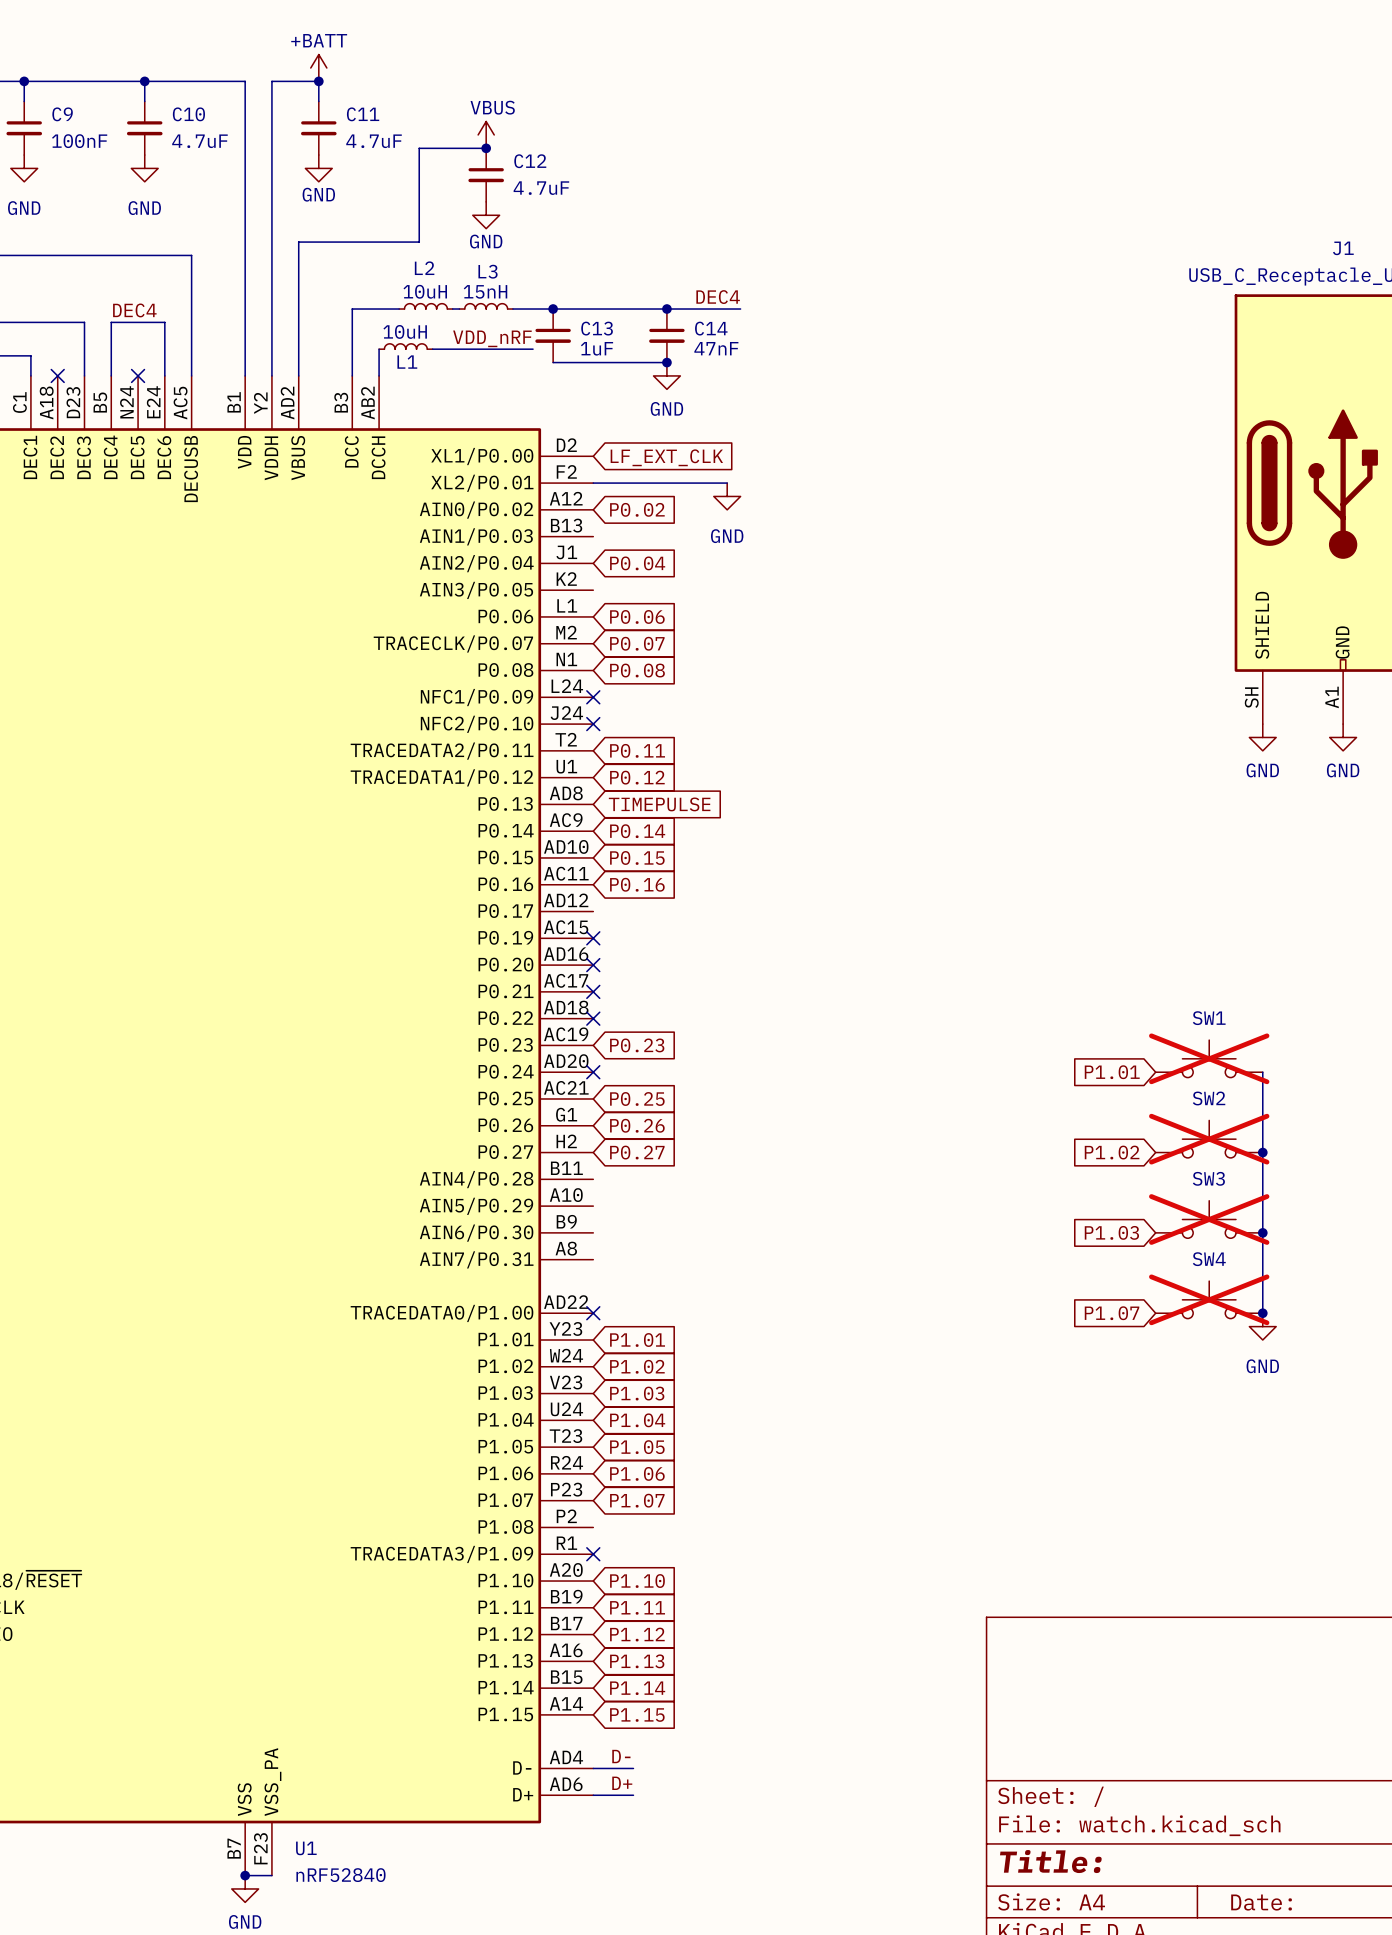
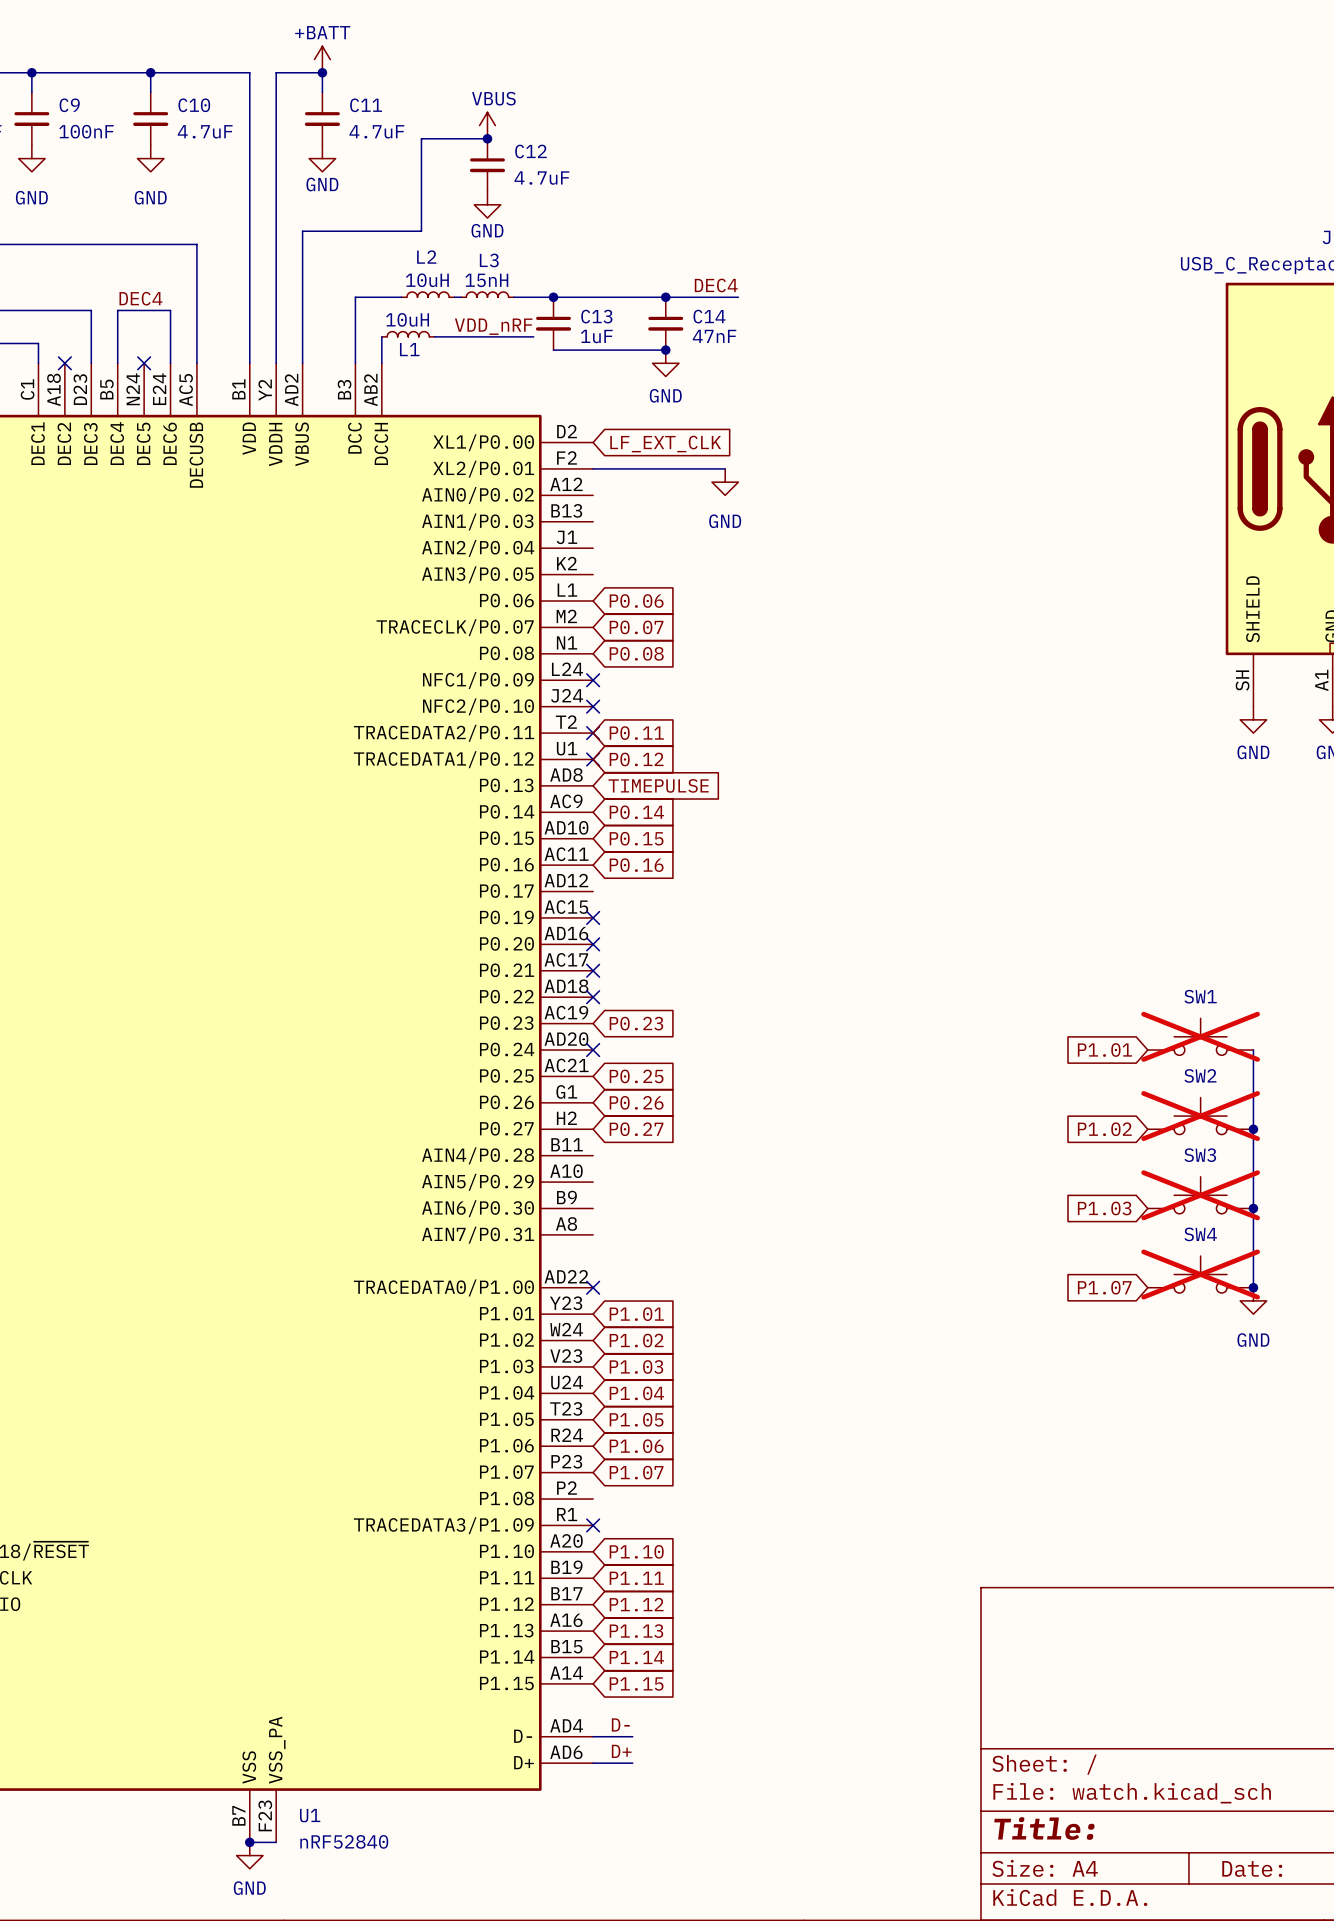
global label: P0.02 (637, 509) -> none
global label: P0.04 (637, 563) -> none
no-connect mark: none -> (593, 733)
no-connect mark: none -> (593, 759)

